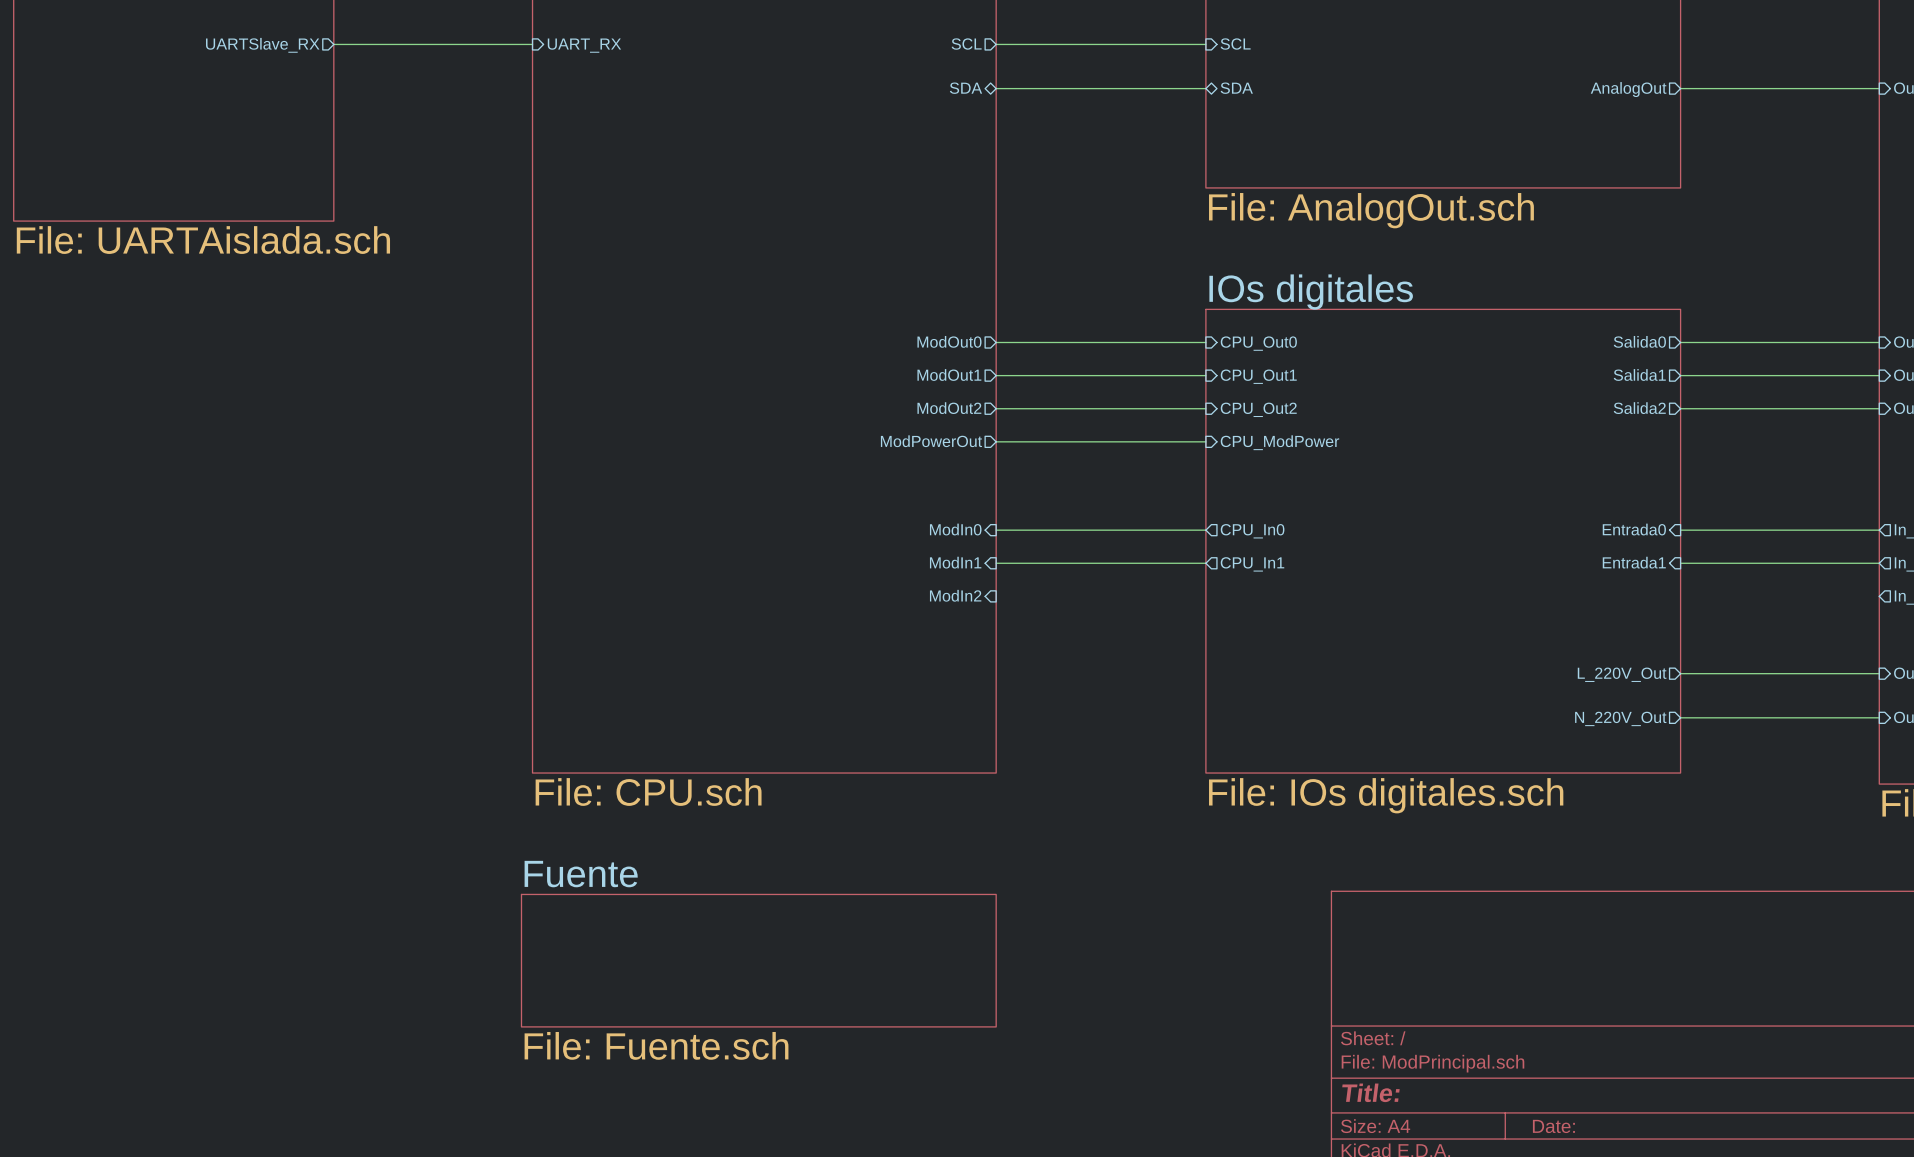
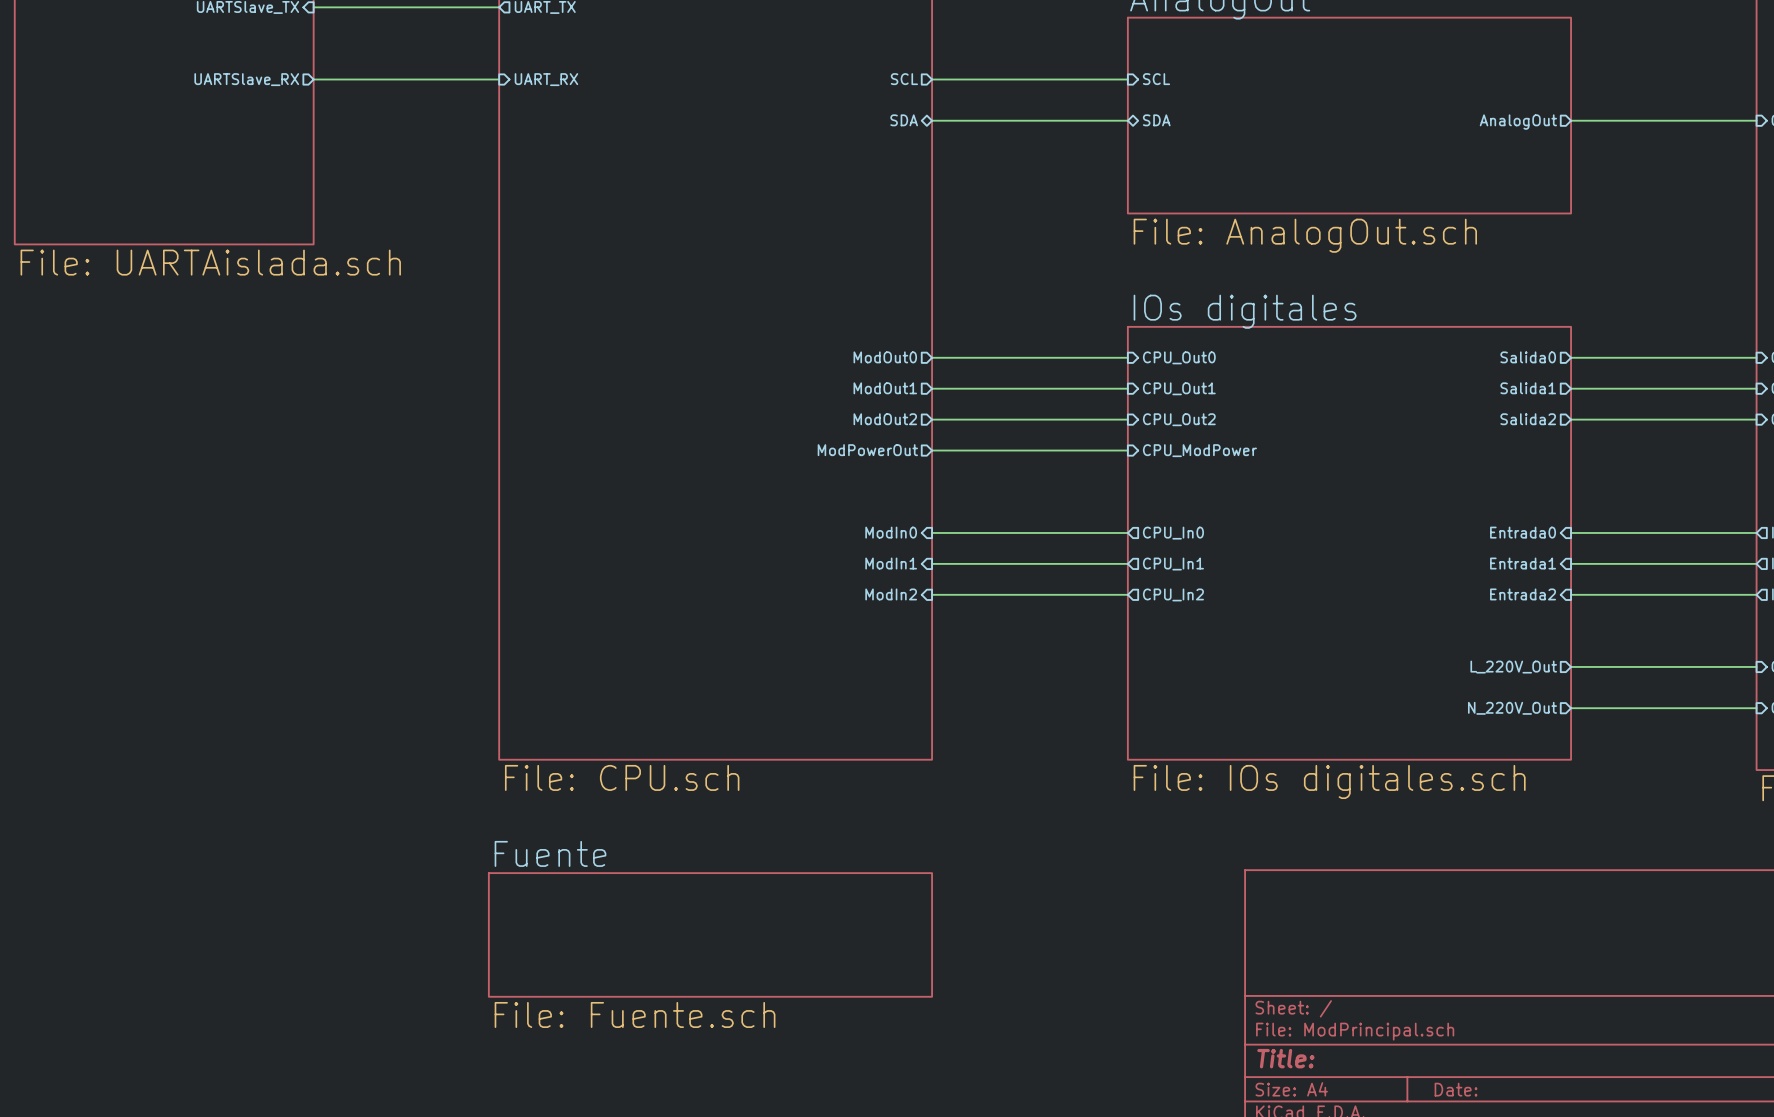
sheet pin: none -> Entrada2 (1523, 594)
wire: none -> (932, 594) (1127, 594)
wire: none -> (1571, 594) (1756, 594)
sheet pin: none -> CPU_In2 (1173, 594)

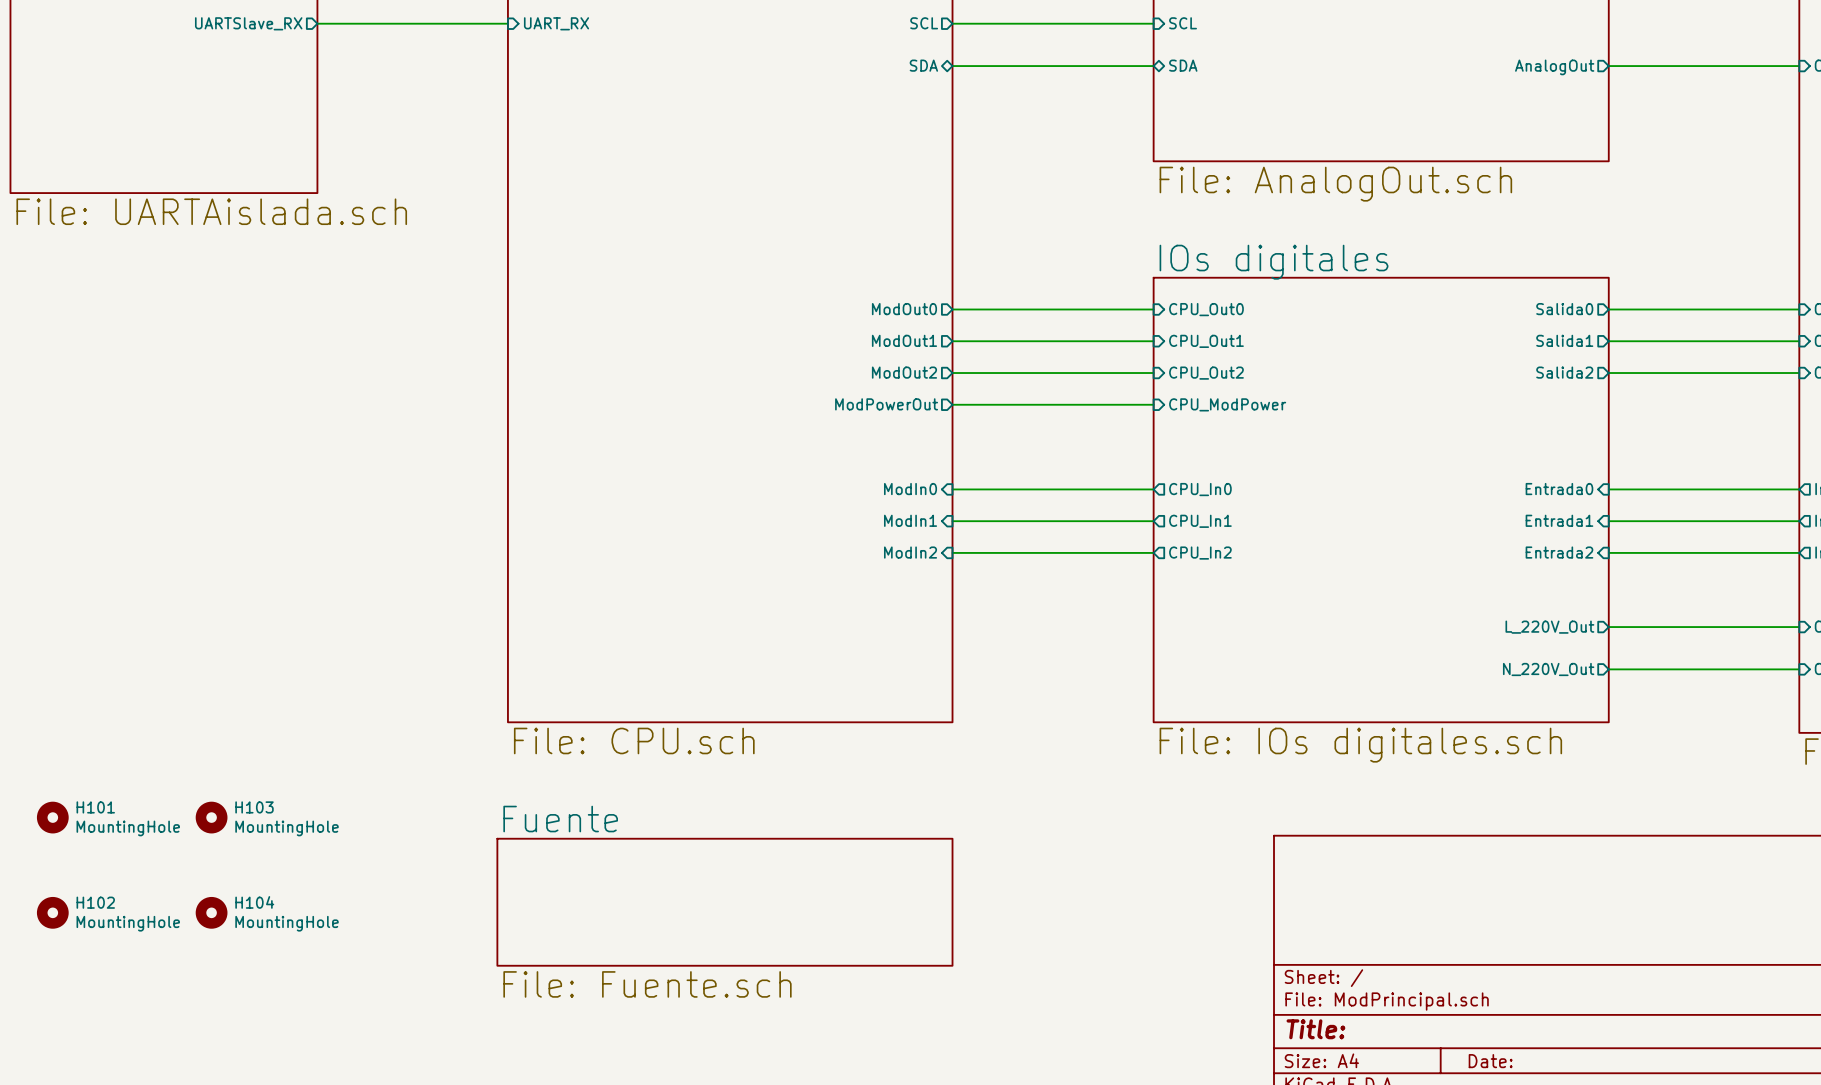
H101: none -> MountingHole (52, 817)
H103: none -> MountingHole (211, 817)
H102: none -> MountingHole (52, 912)
H104: none -> MountingHole (211, 912)

